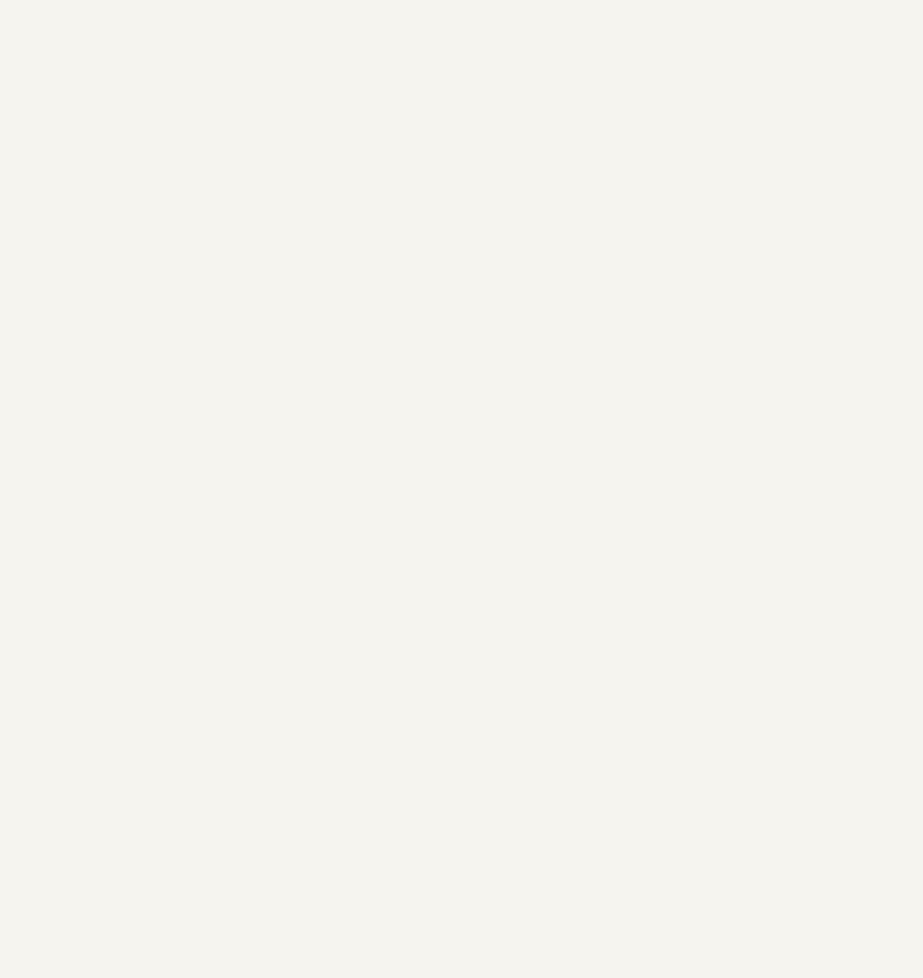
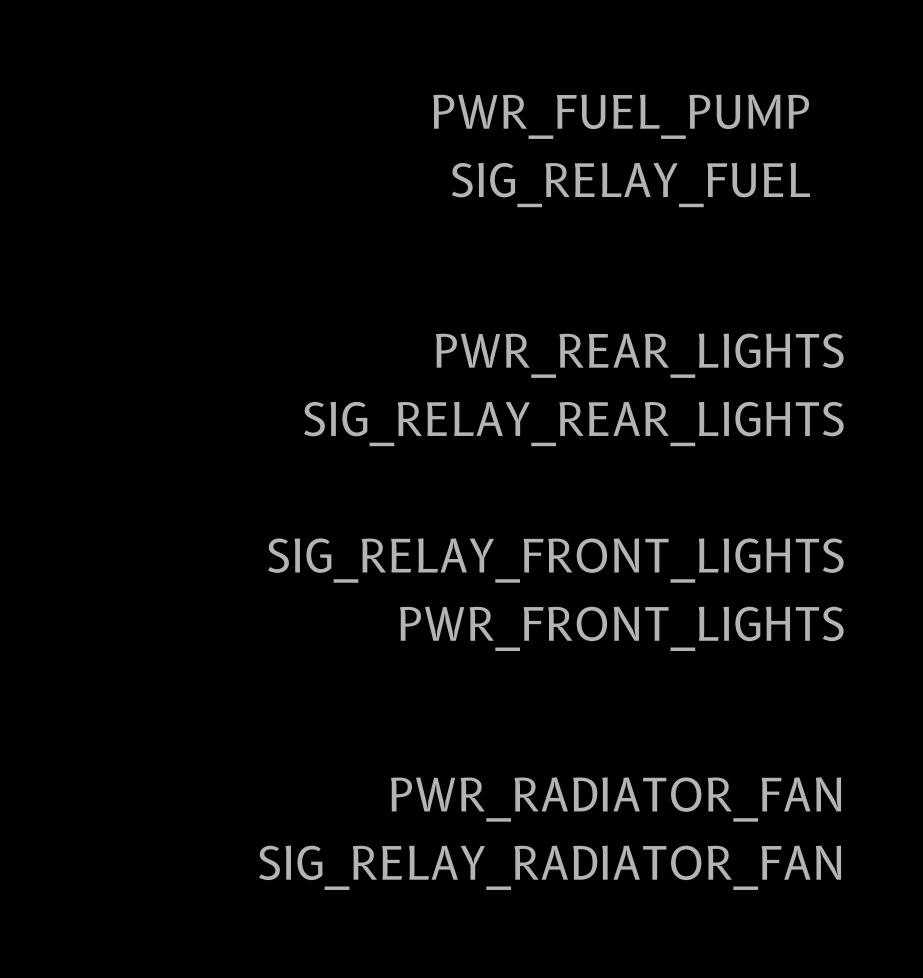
label: none -> PWR_FUEL_PUMP (621, 116)
label: none -> SIG_RELAY_FUEL (630, 185)
label: none -> PWR_REAR_LIGHTS (639, 355)
label: none -> SIG_RELAY_REAR_LIGHTS (573, 423)
label: none -> SIG_RELAY_FRONT_LIGHTS (555, 560)
label: none -> PWR_FRONT_LIGHTS (621, 628)
label: none -> PWR_RADIATOR_FAN (616, 799)
label: none -> SIG_RELAY_RADIATOR_FAN (550, 867)

